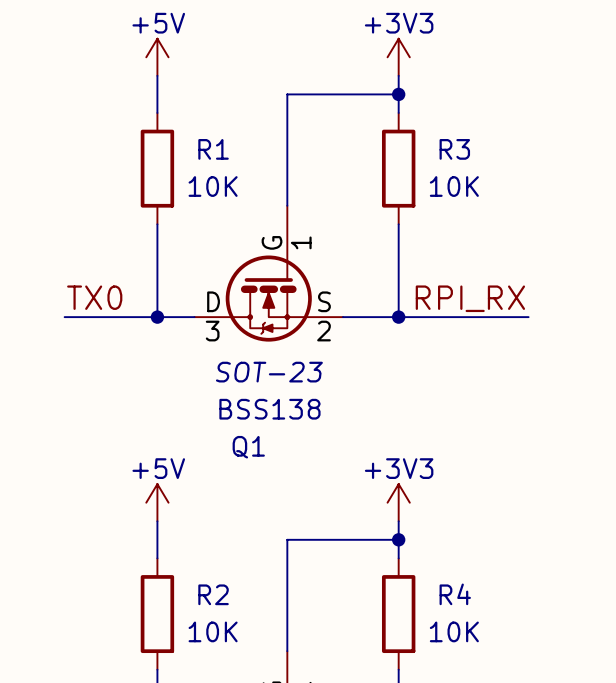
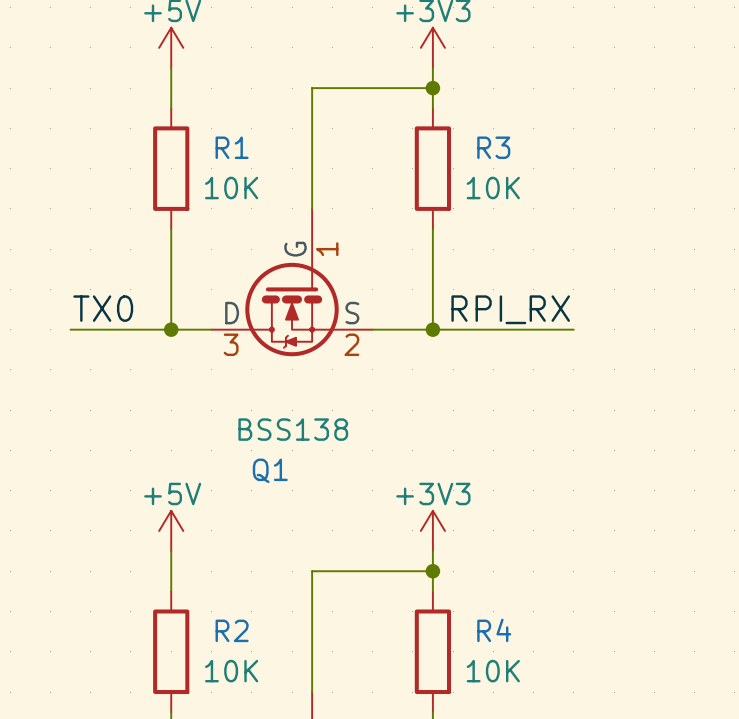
Q1 text: SOT-23 (269, 372) -> none

